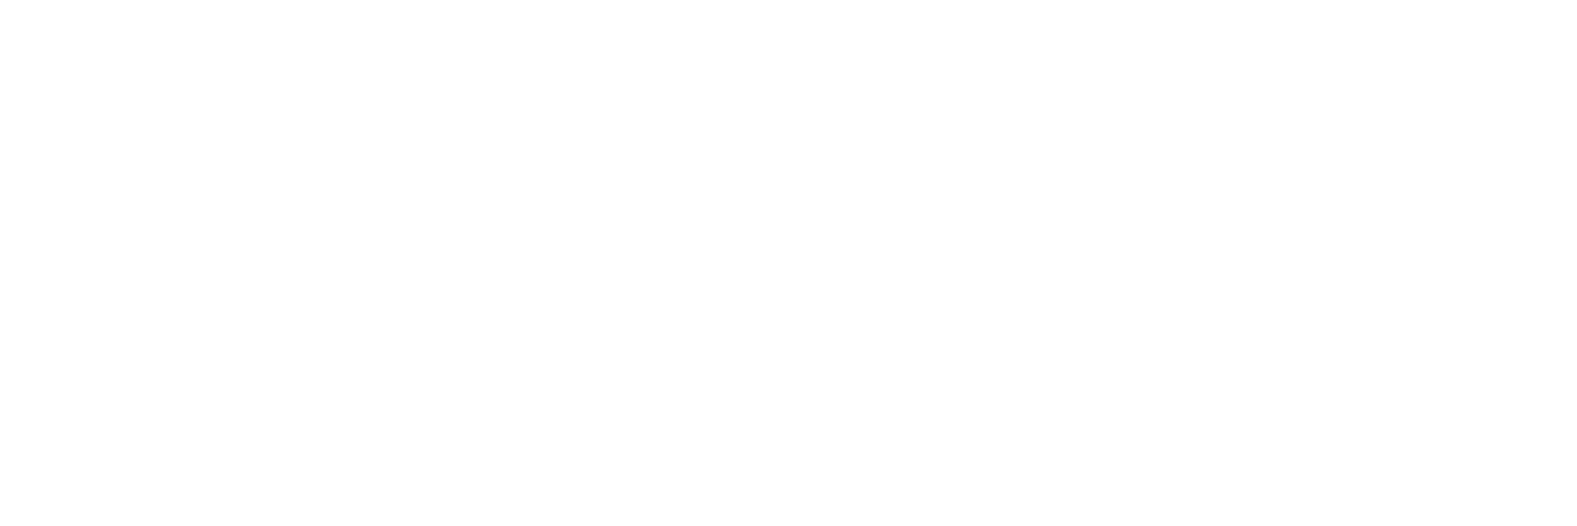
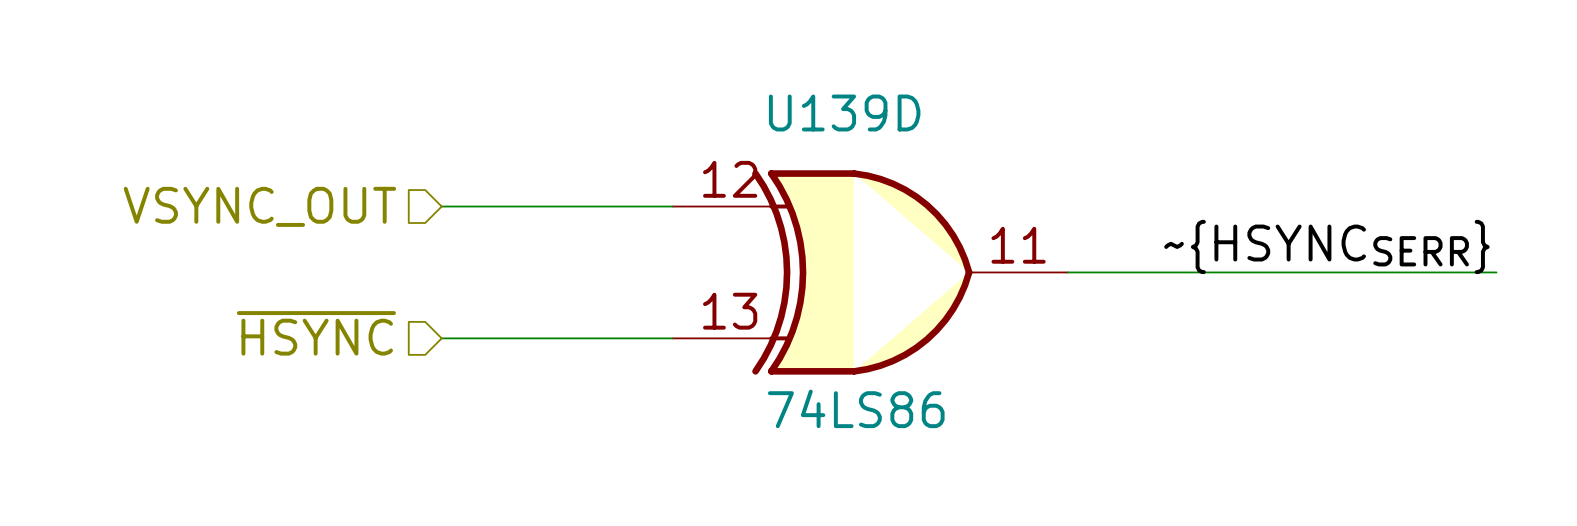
hierarchical label: none -> VSYNC_OUT (259, 206)
wire: none -> (441, 206) (672, 206)
label: none -> ~{HSYNCSERR} (1326, 246)
U139D: none -> 74LS86 (870, 272)
wire: none -> (1068, 272) (1496, 272)
hierarchical label: none -> ~{HSYNC} (316, 333)
wire: none -> (441, 338) (672, 338)

